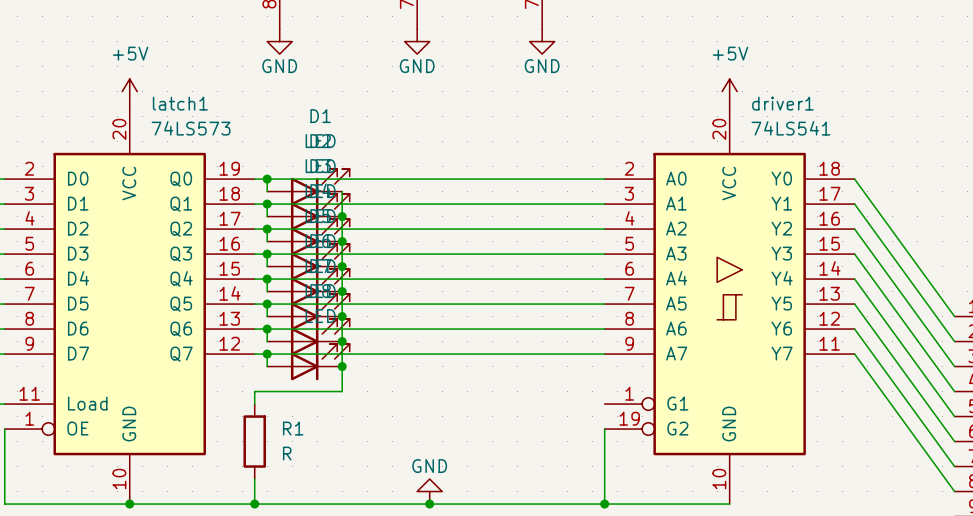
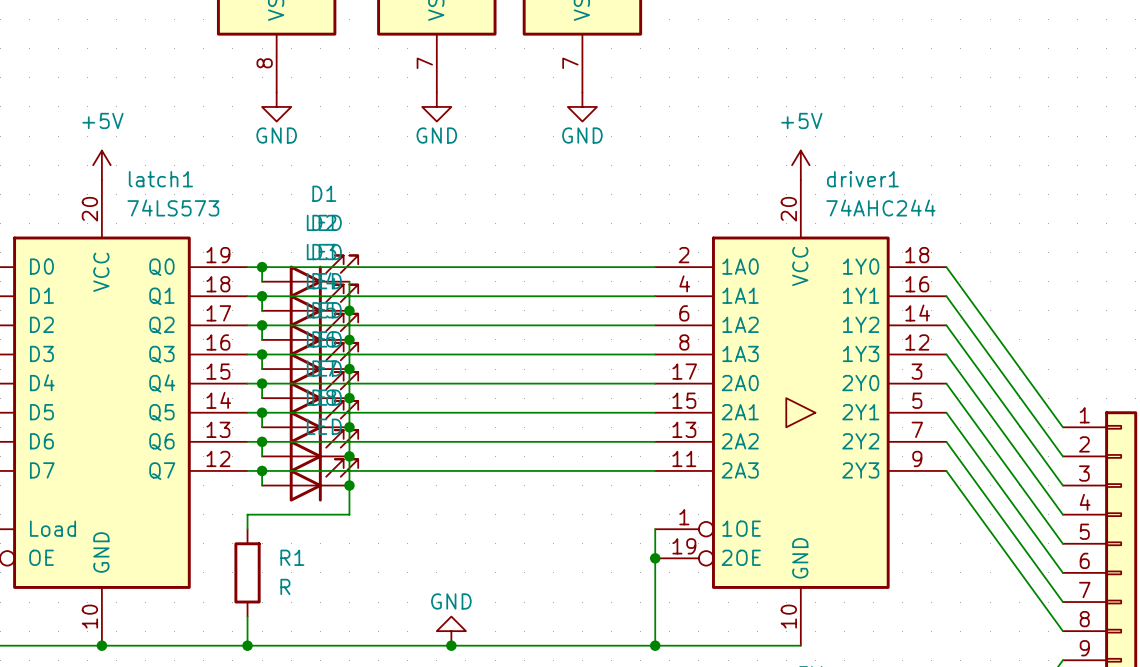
driver1 symbol: [604, 104, 855, 505] -> [655, 179, 947, 646]
driver1 value: 74LS541 (790, 128) -> 74AHC244 (880, 207)
wire: none -> (655, 529) (655, 558)
junction: none -> (655, 558)

